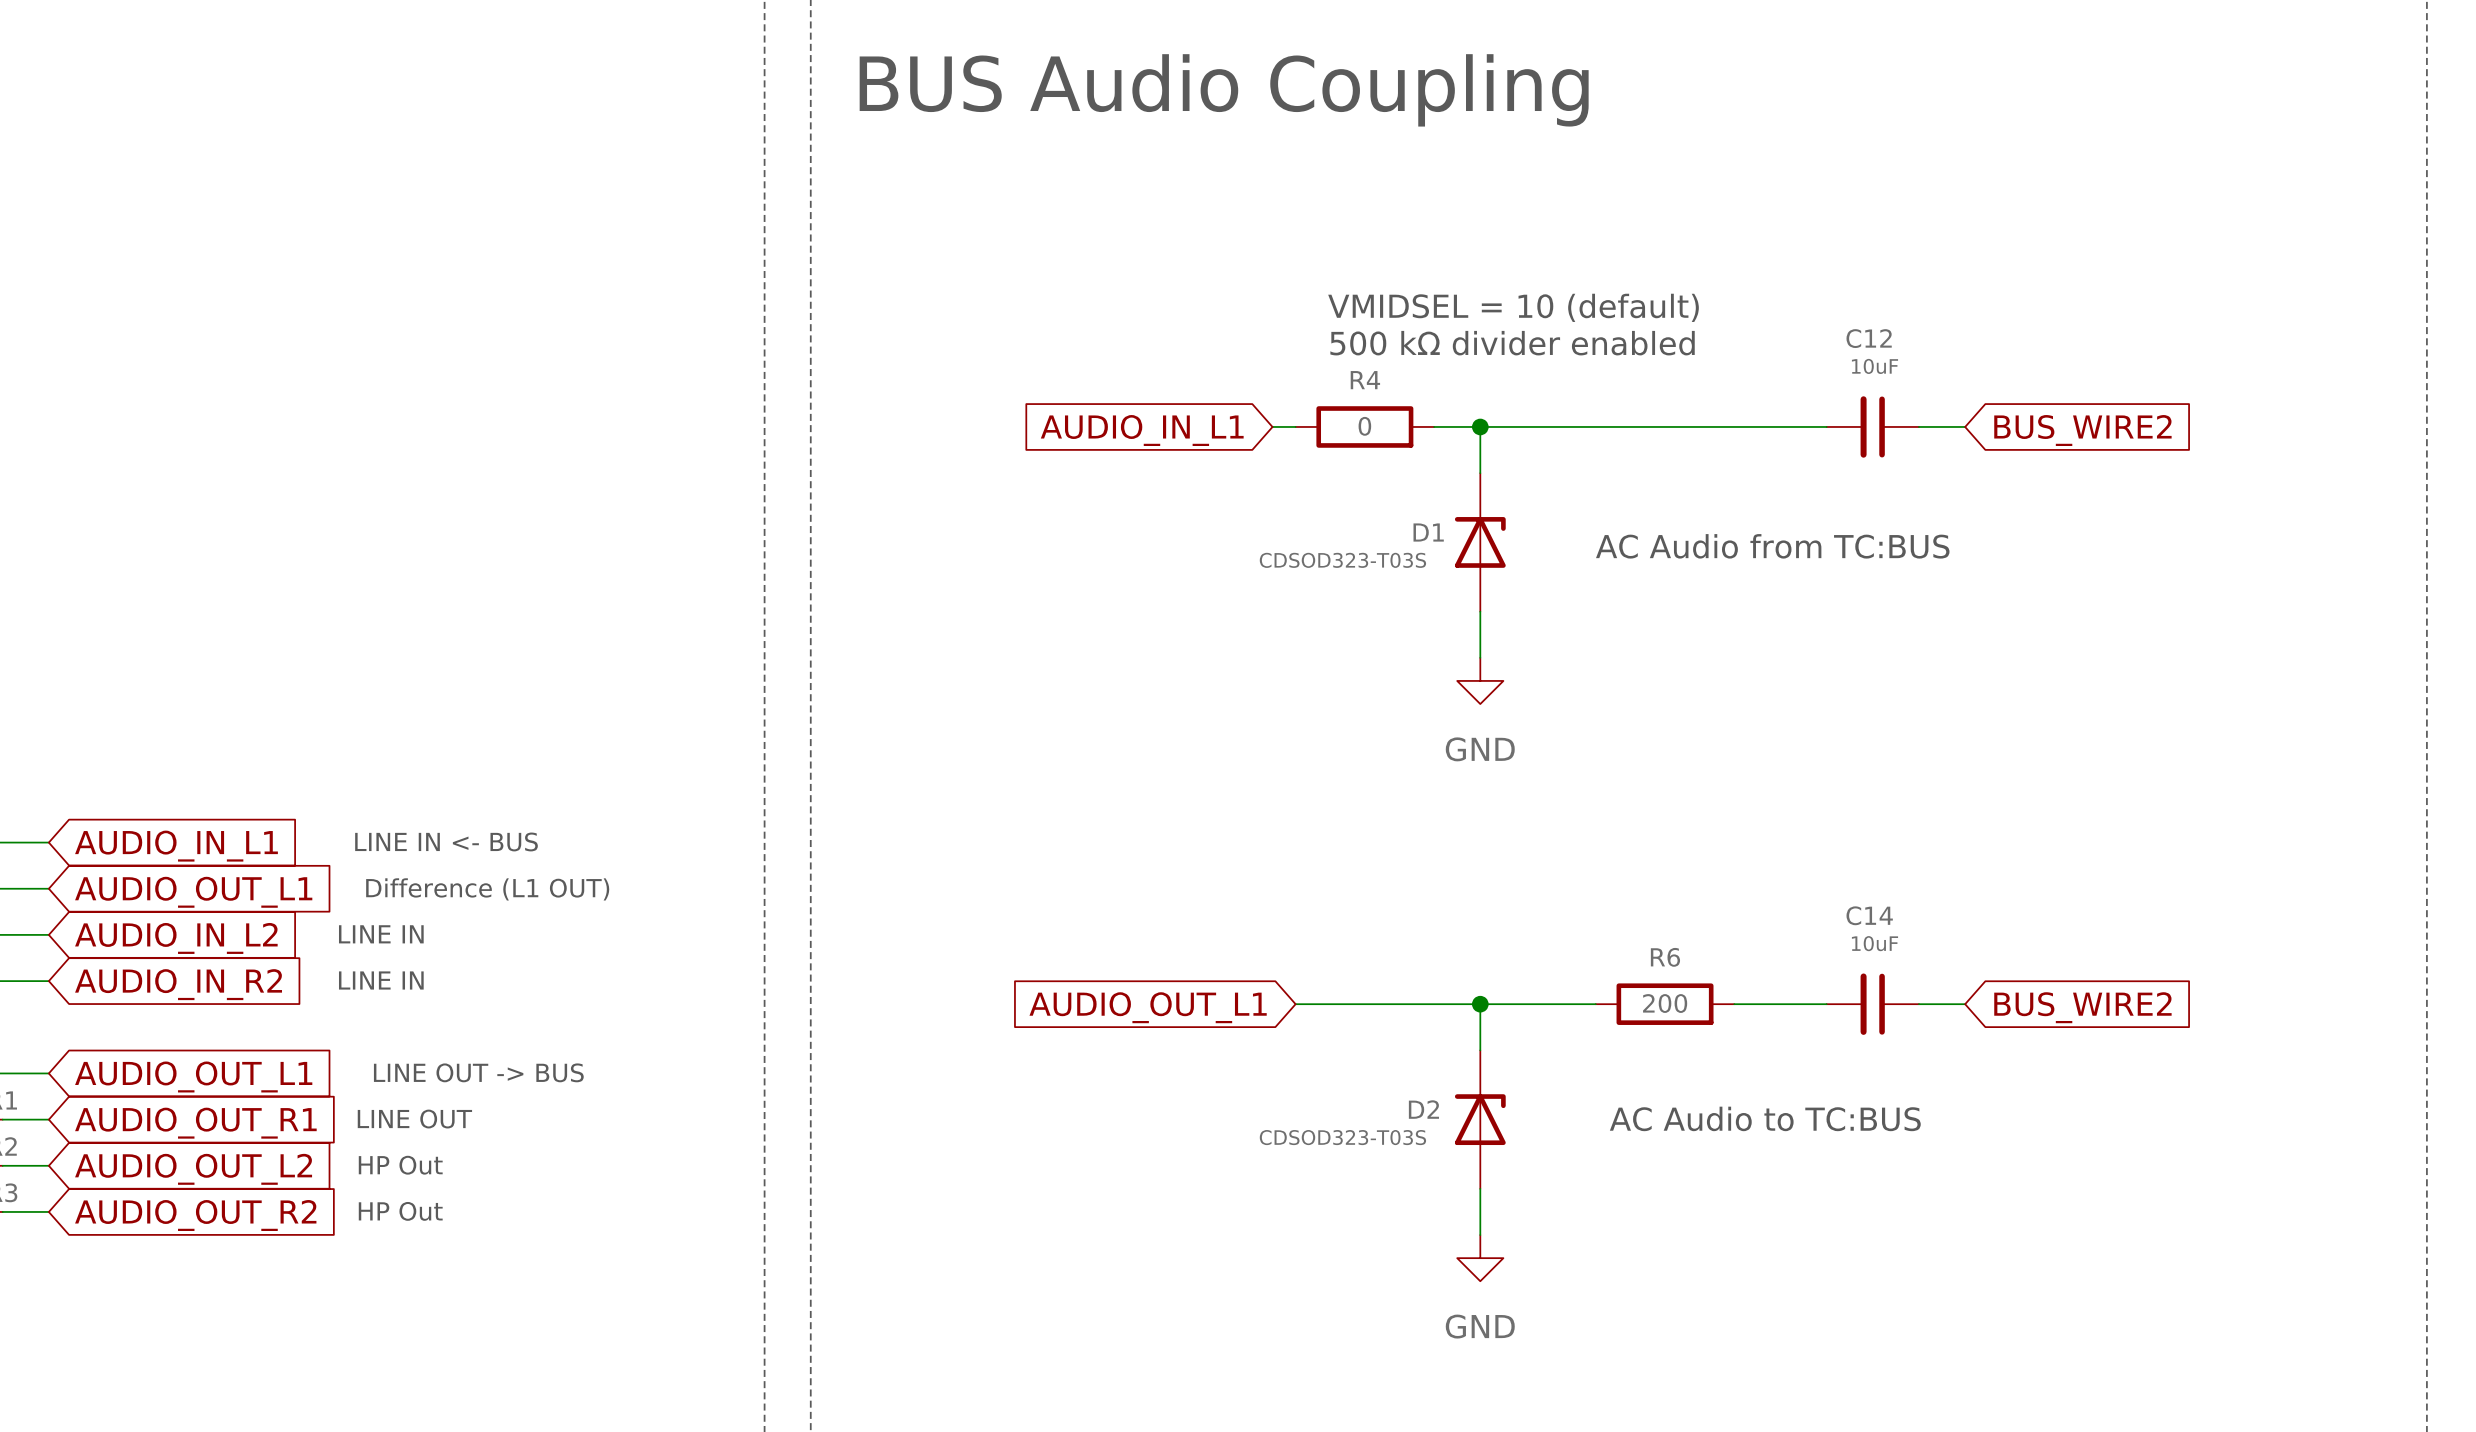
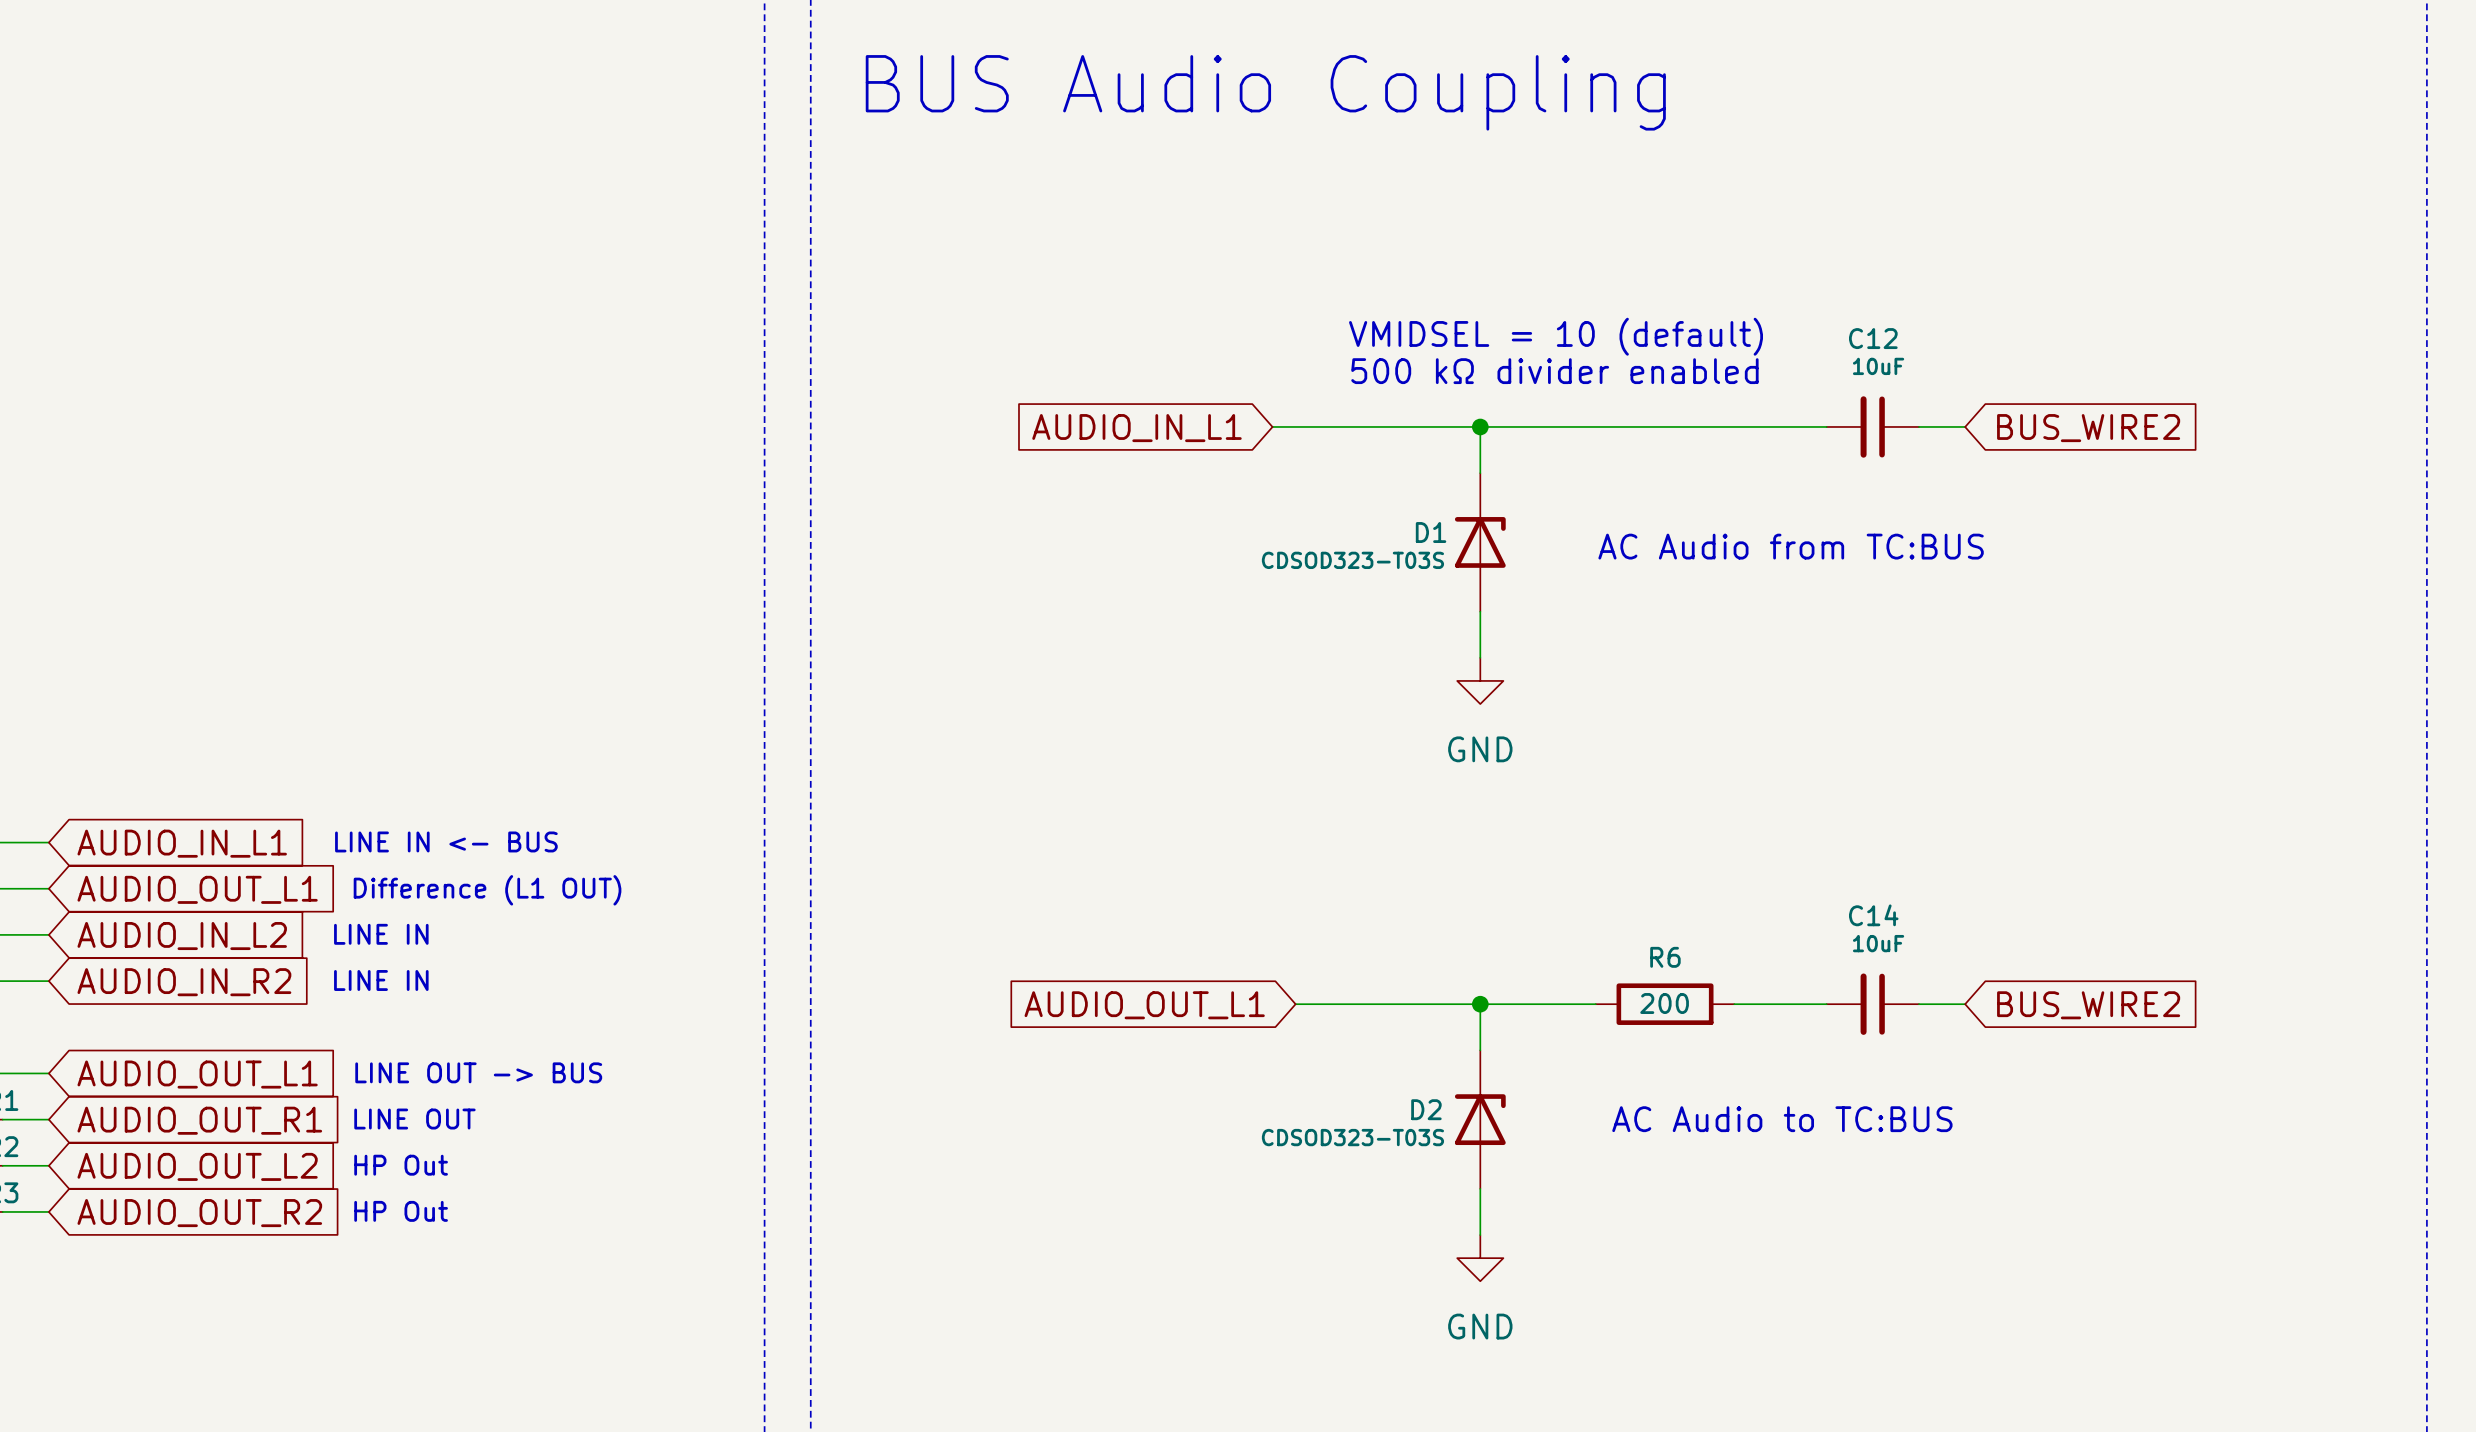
text position: VMIDSEL = 10 (default) (1513, 307) -> VMIDSEL = 10 (default) (1556, 336)
text position: 500 kΩ divider enabled (1512, 343) -> 500 kΩ divider enabled (1554, 371)
wire: none -> (1295, 426) (1434, 426)
R4: 0 (1364, 426) -> none

